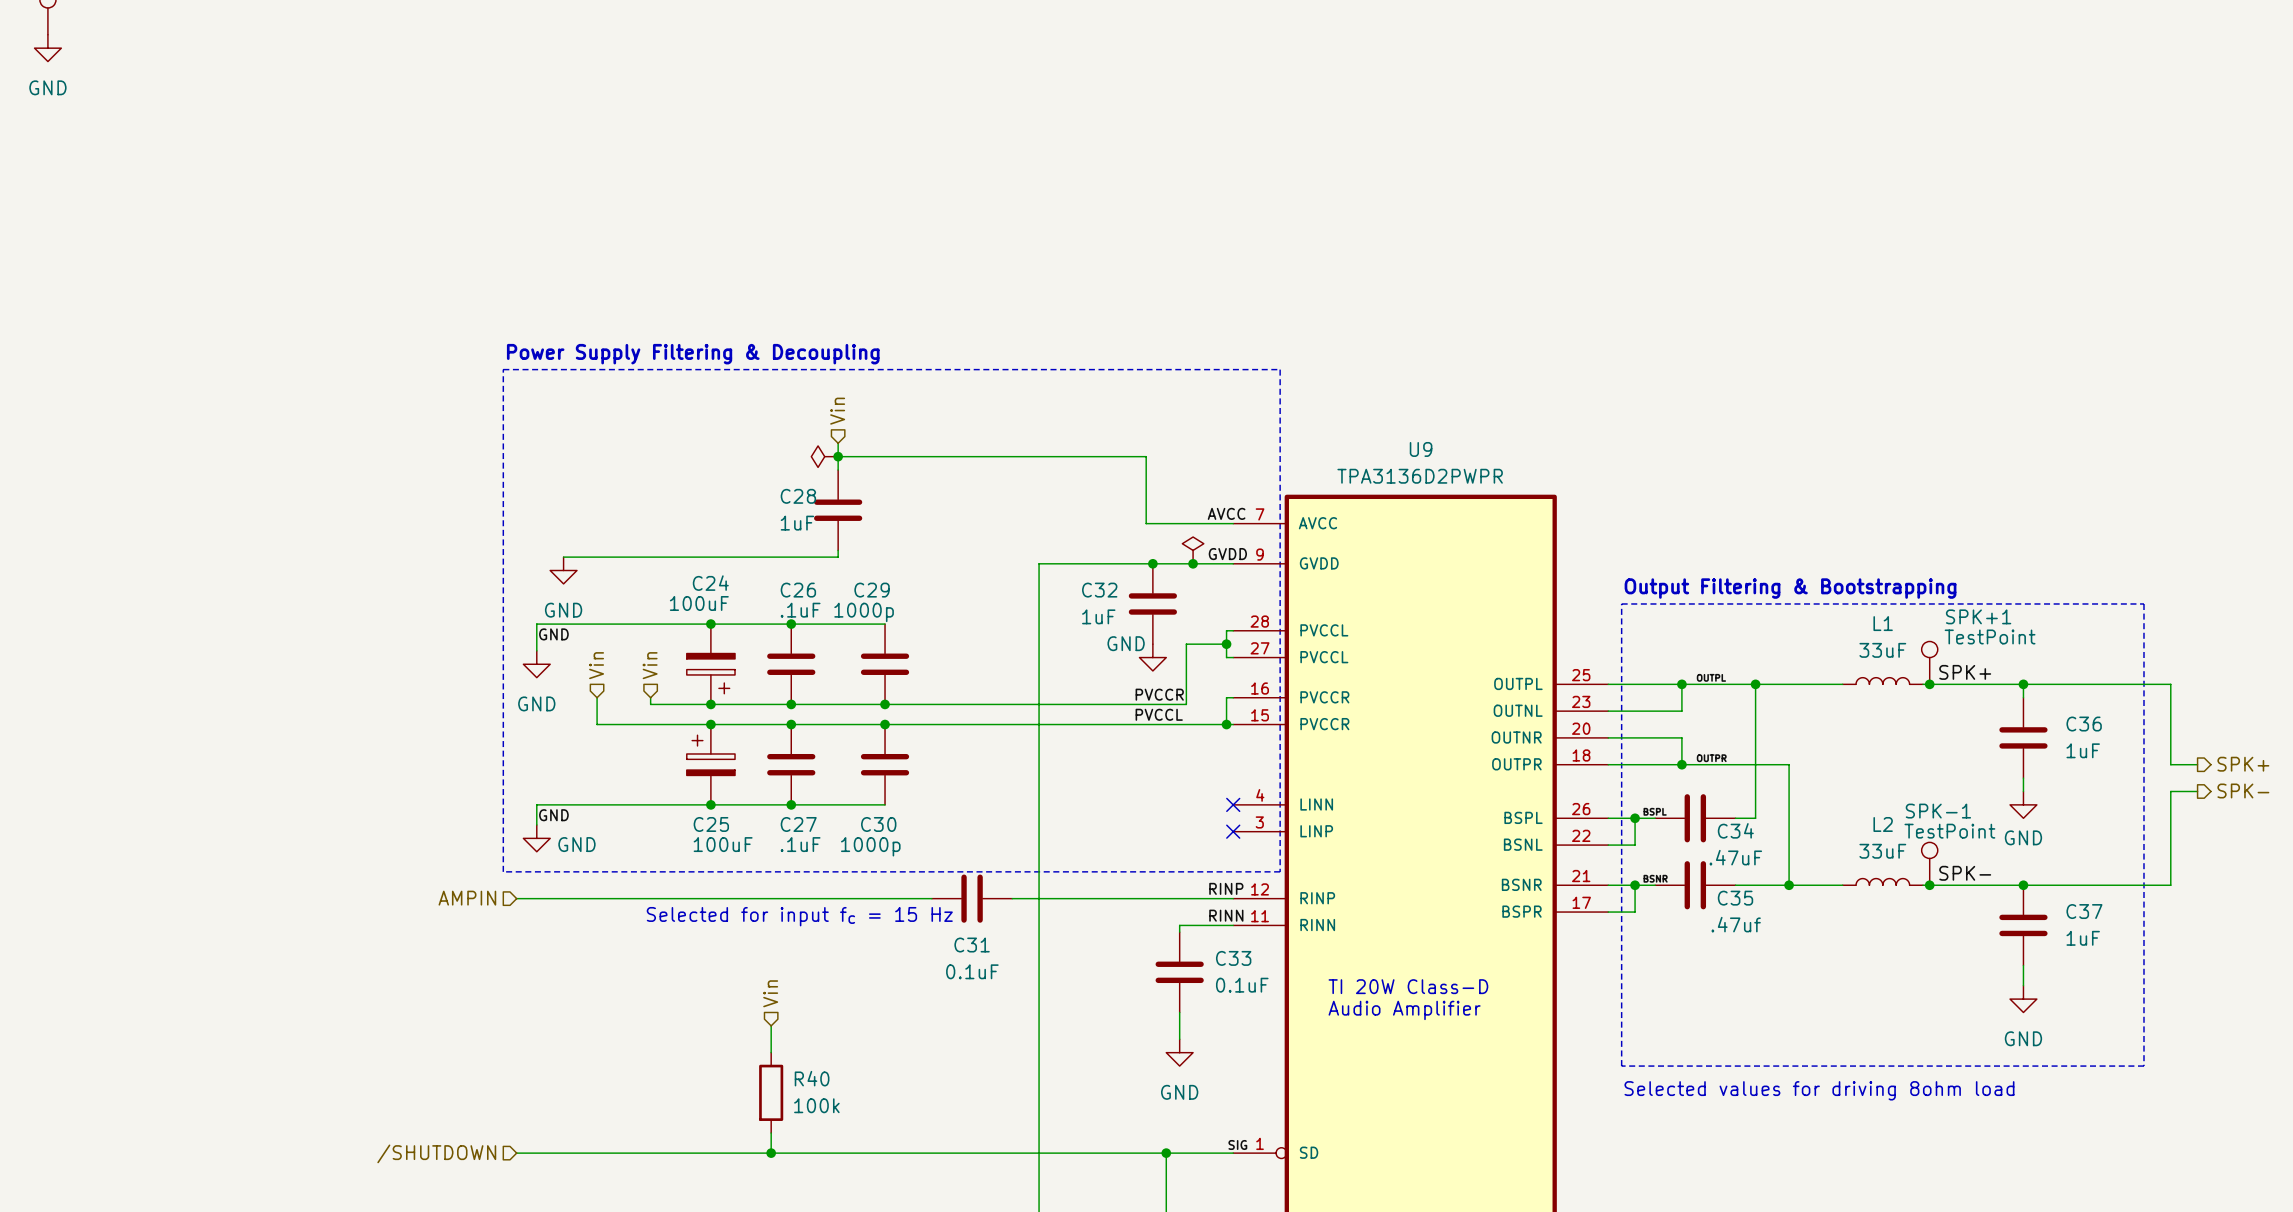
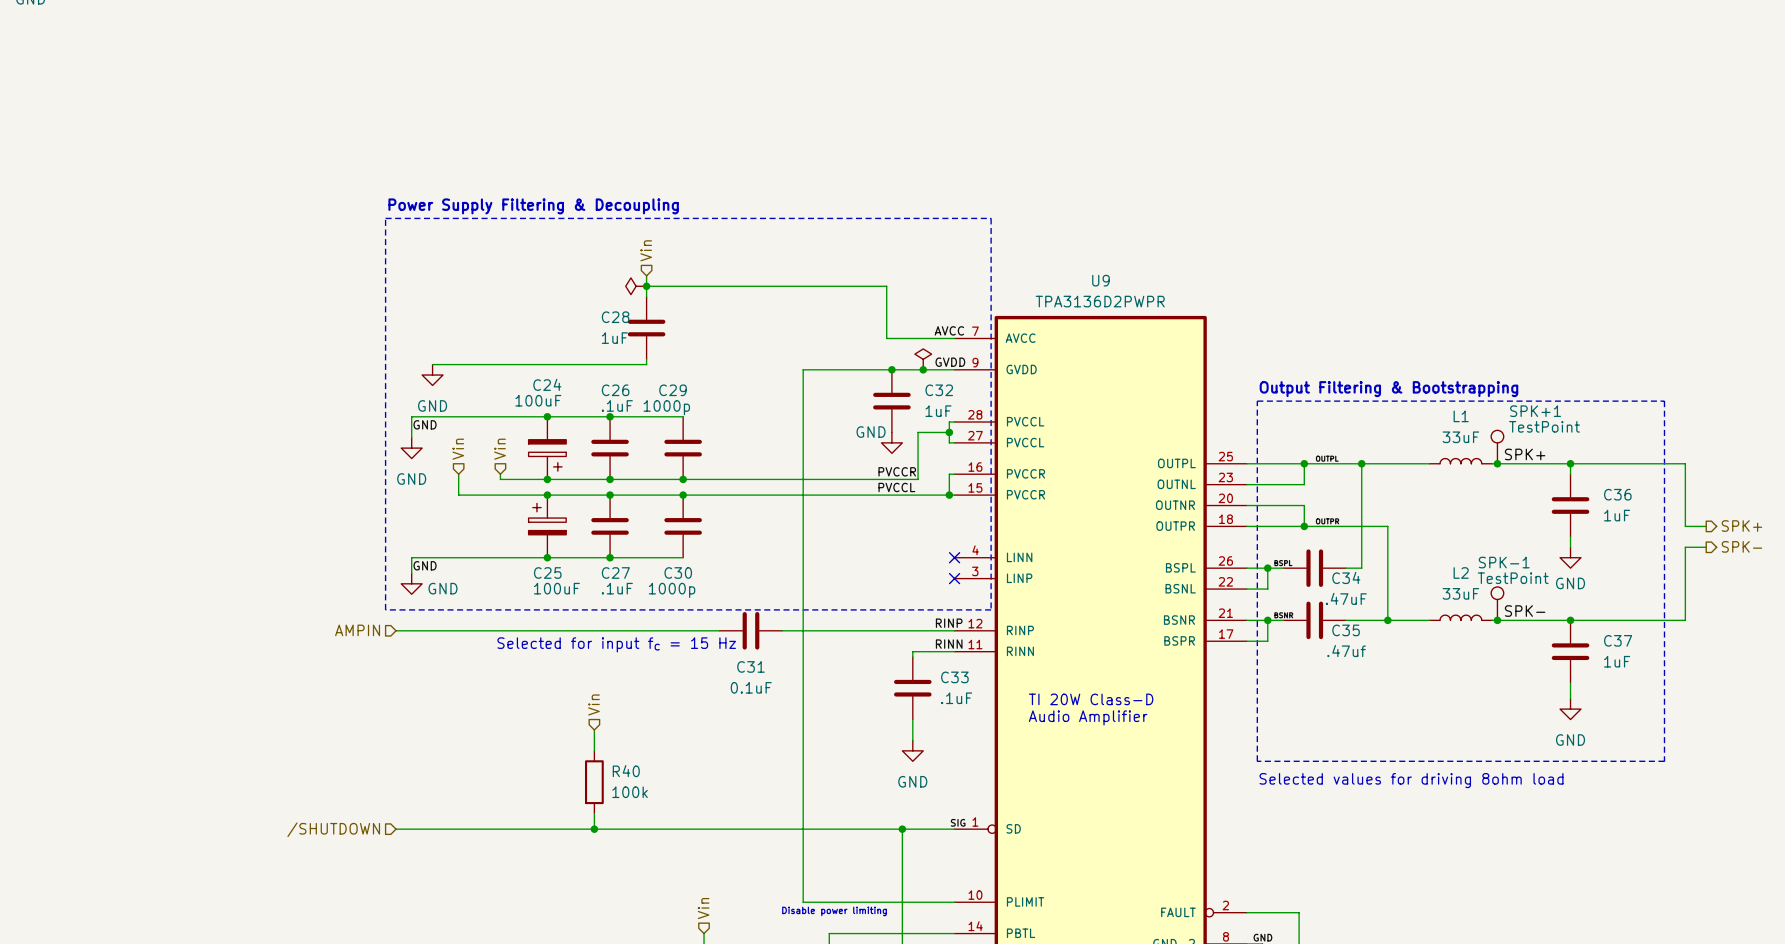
C32 name position: C32 (1099, 590) -> C32 (939, 390)
C32 value position: 1uF (1098, 616) -> 1uF (938, 411)
C33 value: 0.1uF (1242, 985) -> .1uF (956, 698)

